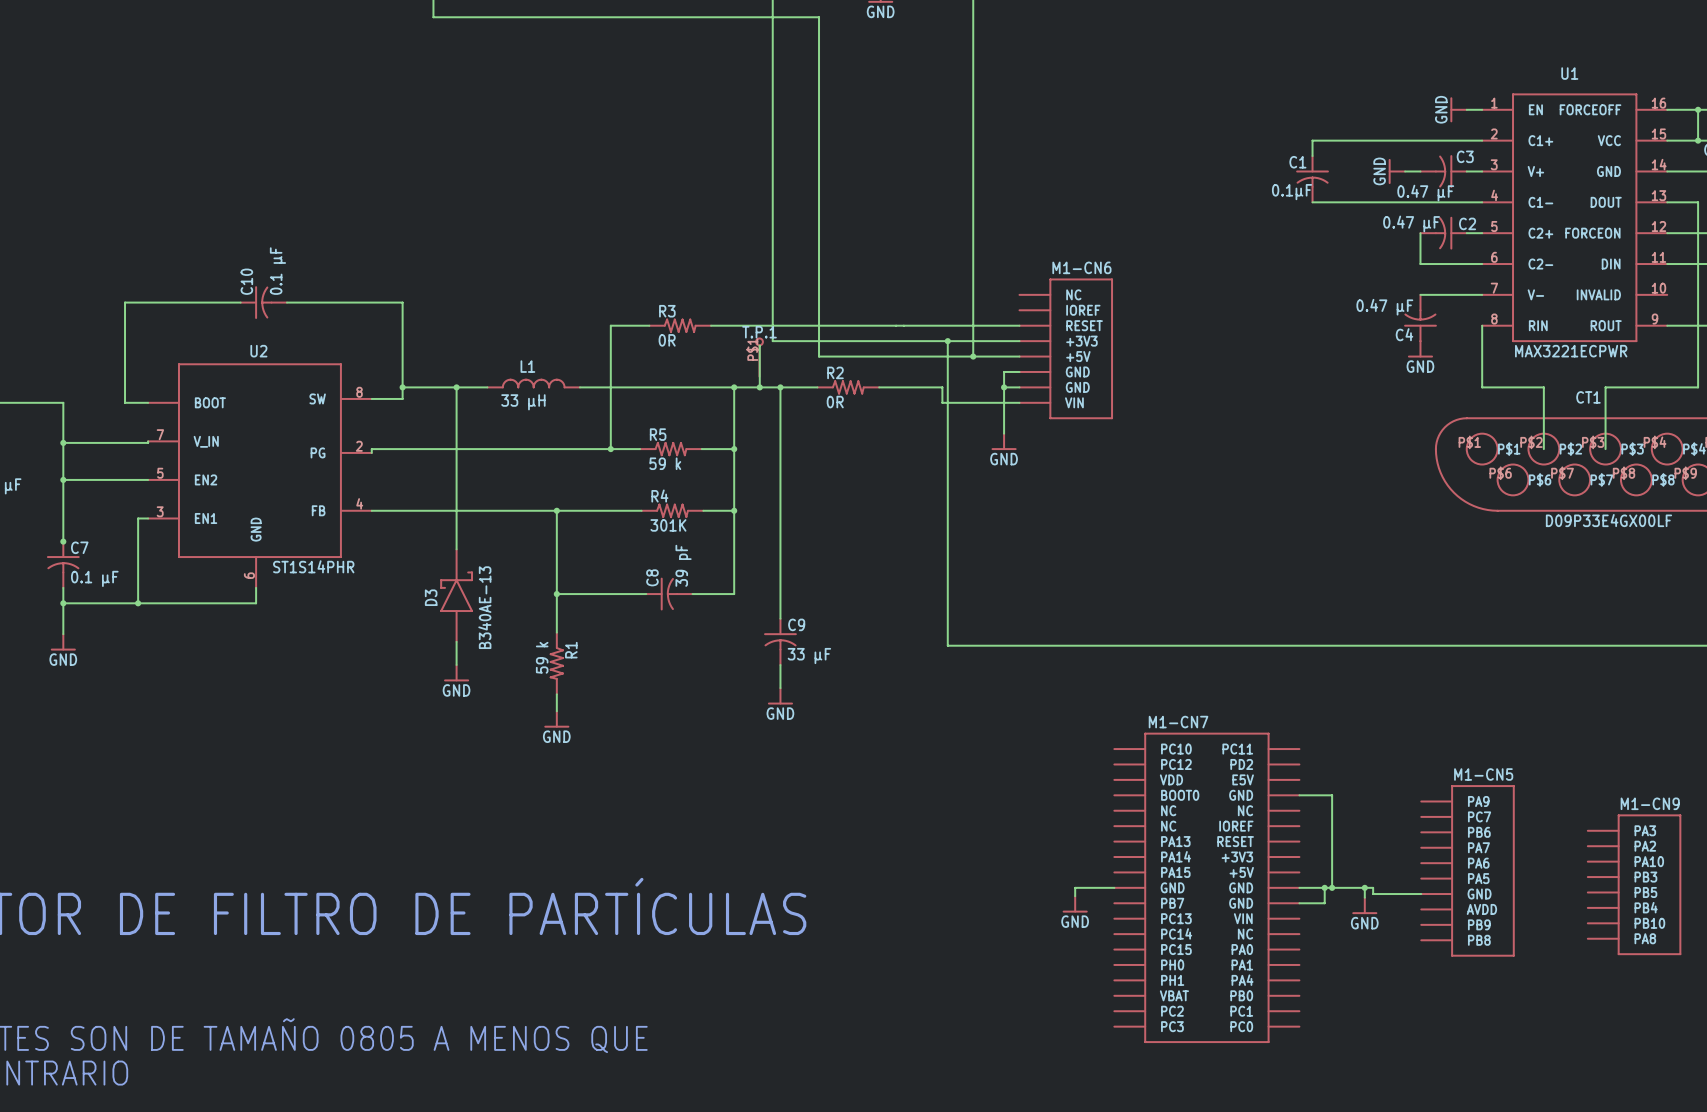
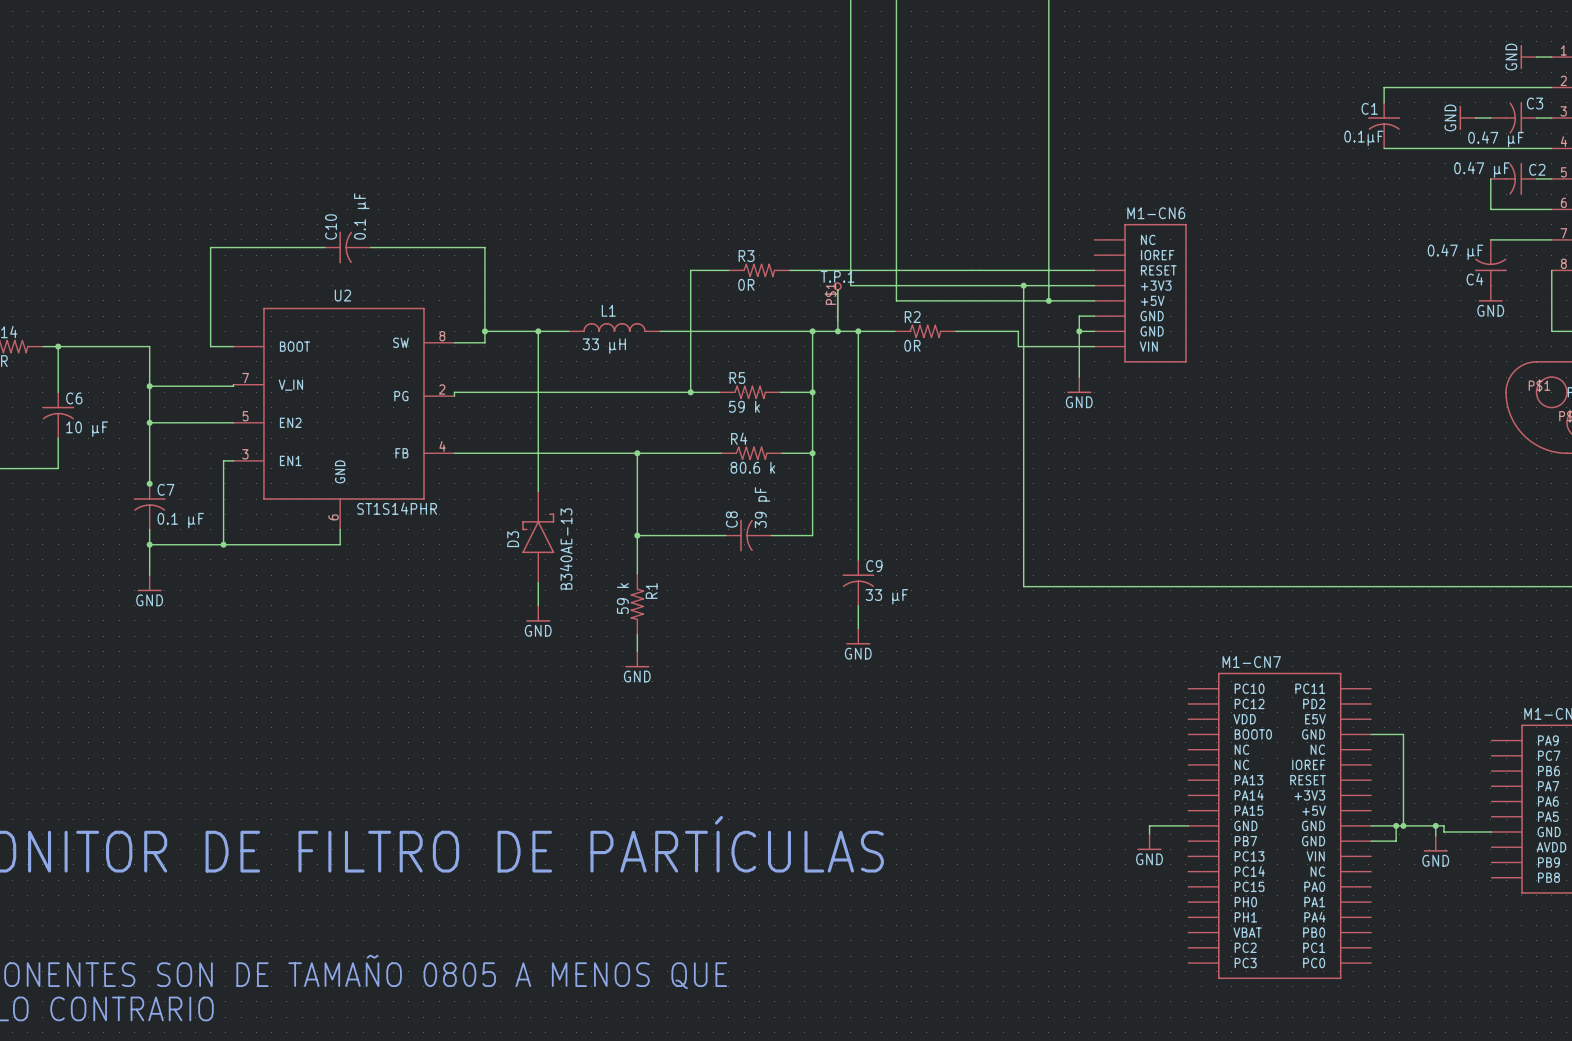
R4 value: 301K (668, 525) -> 80.6 k (752, 467)

